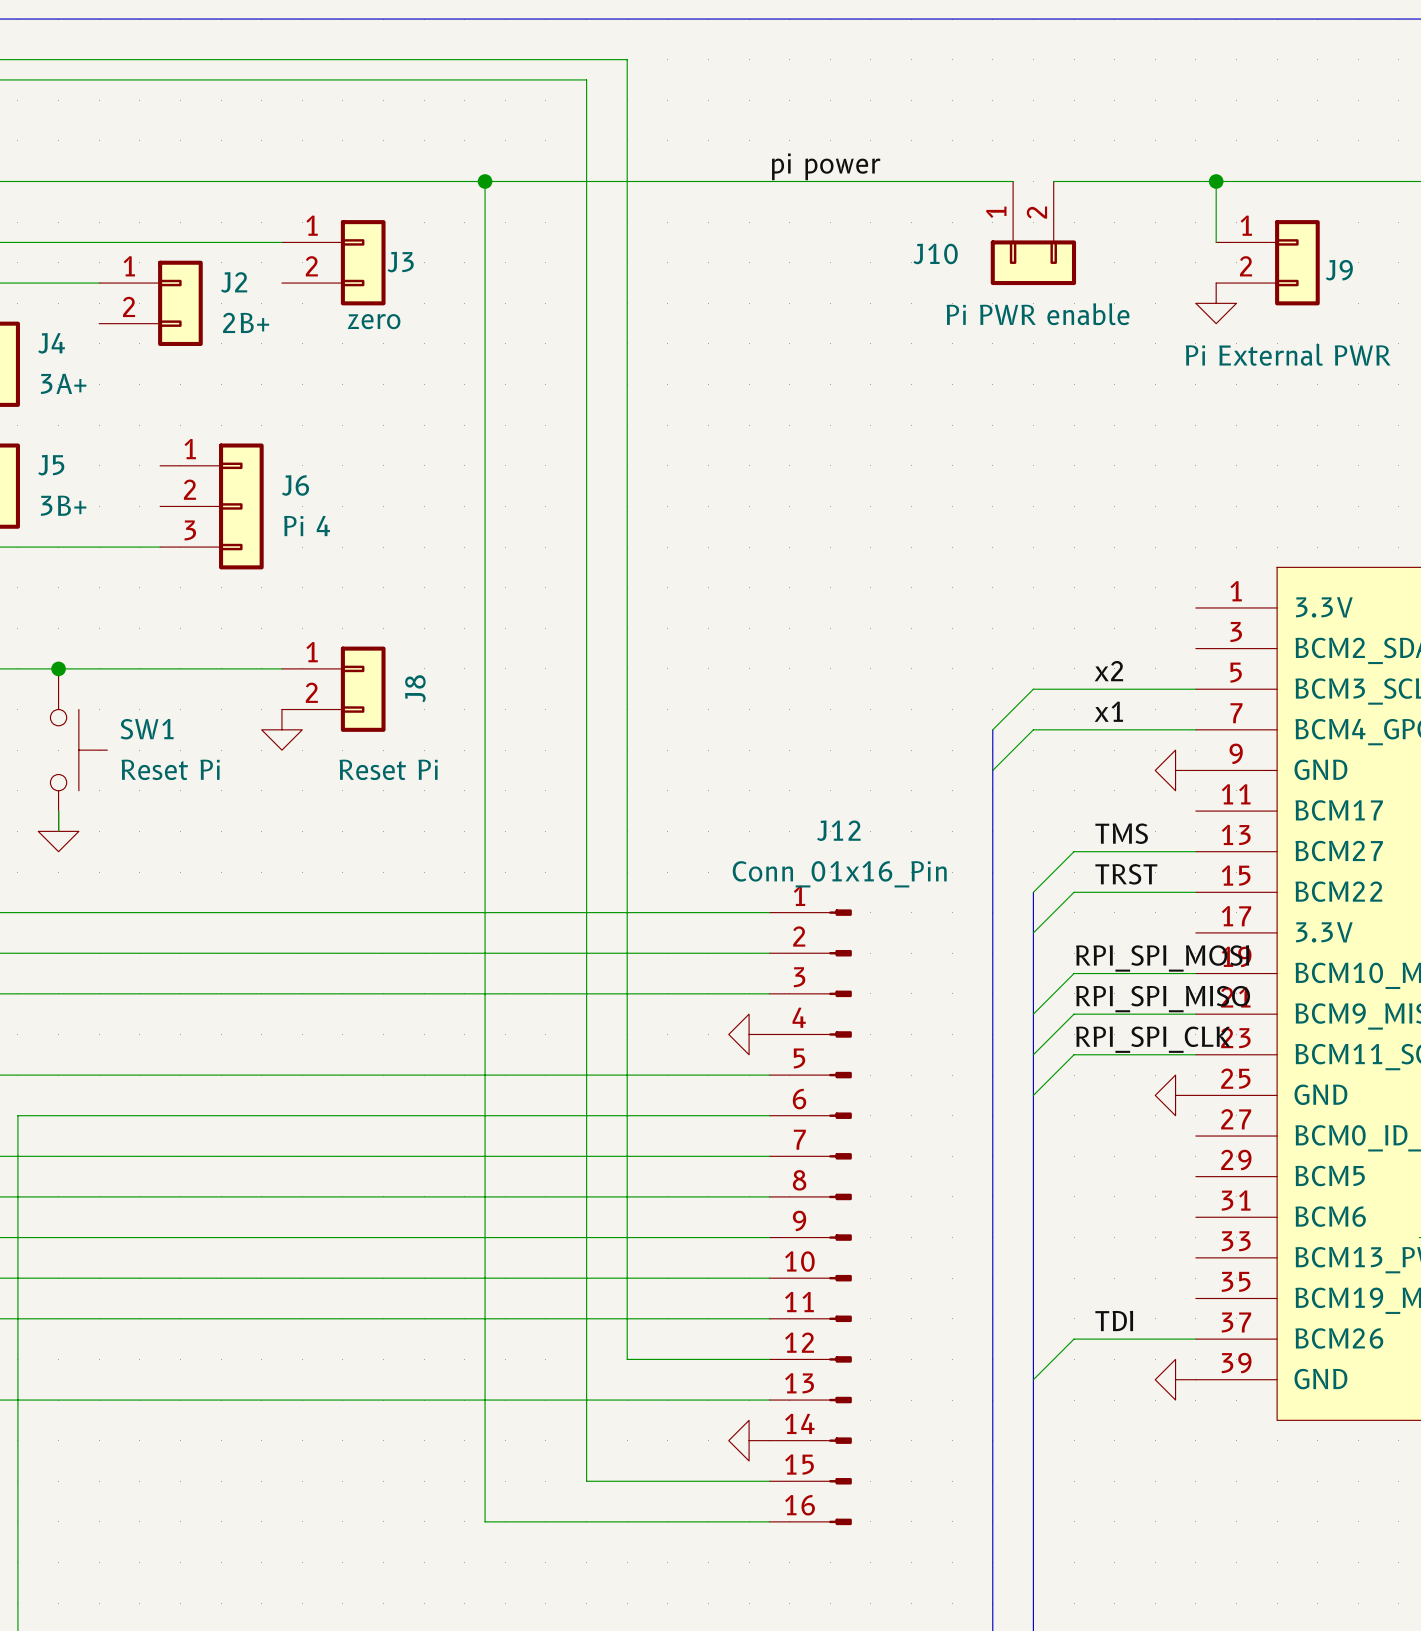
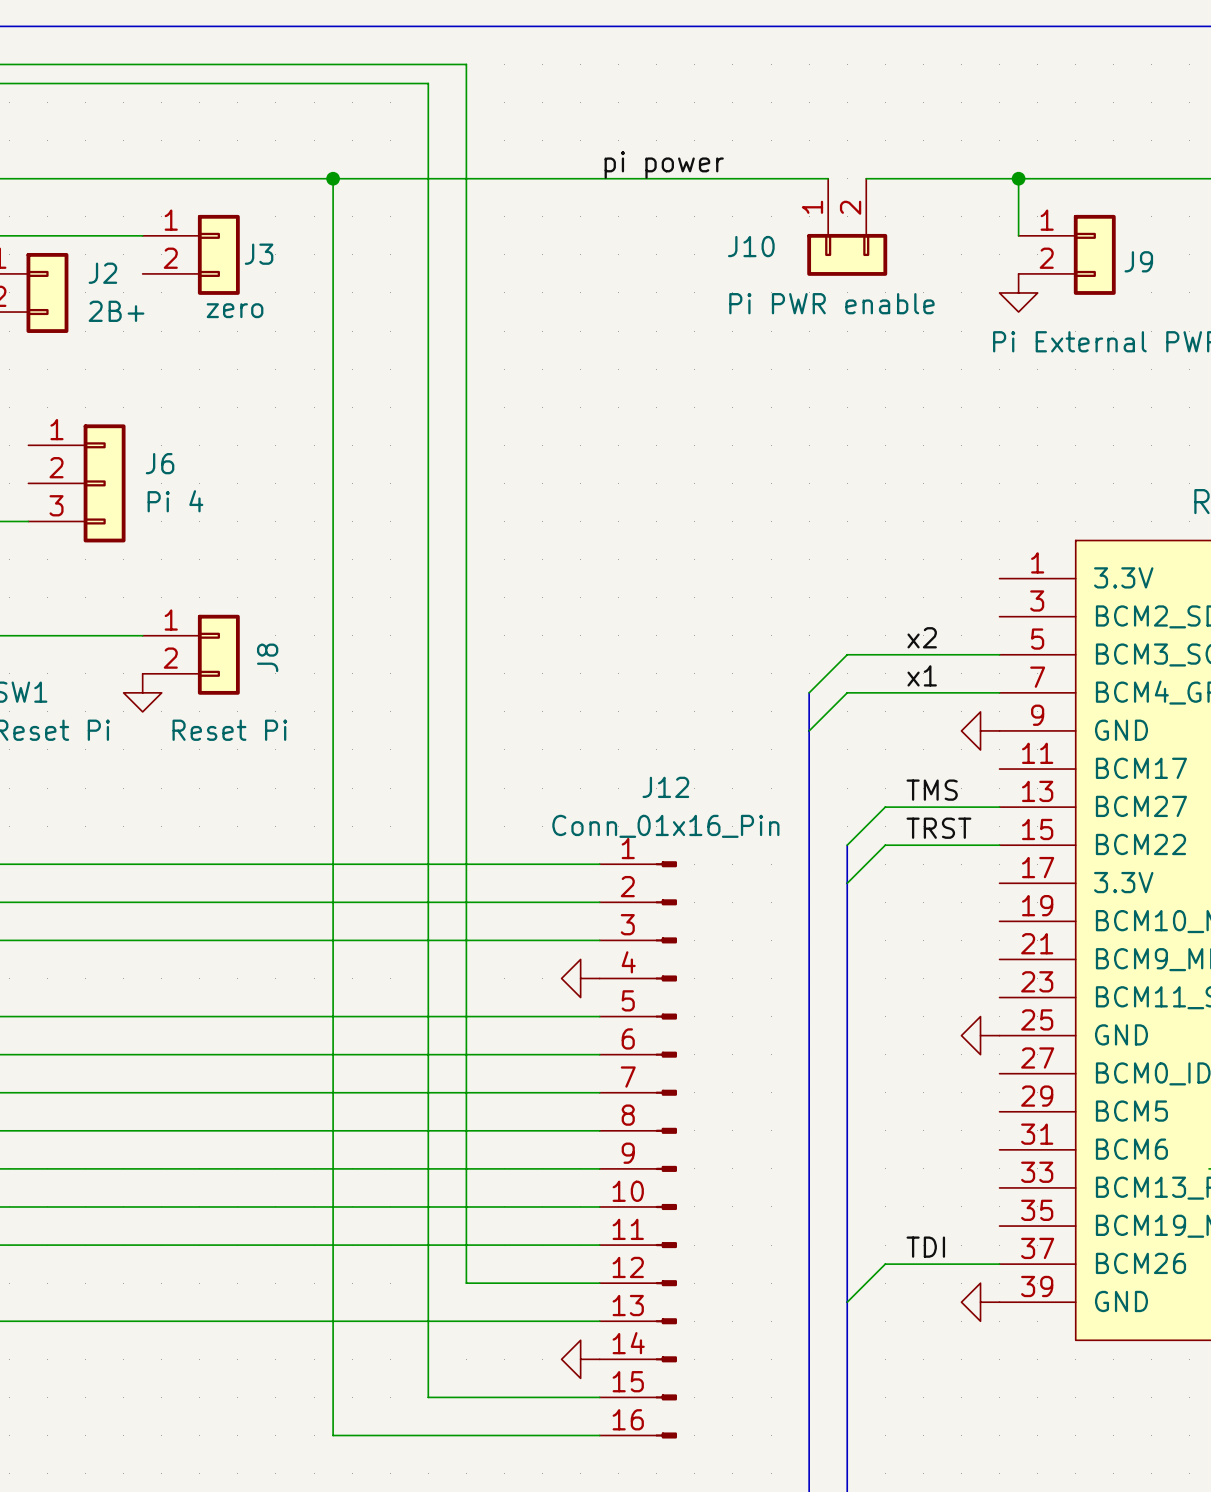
label: RPI_SPI_MOSI (1162, 958) -> none
wire: (1195, 973) (1074, 973) (1033, 1014) -> none
label: RPI_SPI_MISO (1163, 999) -> none
wire: (1195, 1014) (1074, 1014) (1033, 1054) -> none
label: RPI_SPI_CLK (1153, 1039) -> none
wire: (1195, 1054) (1074, 1054) (1033, 1095) -> none

